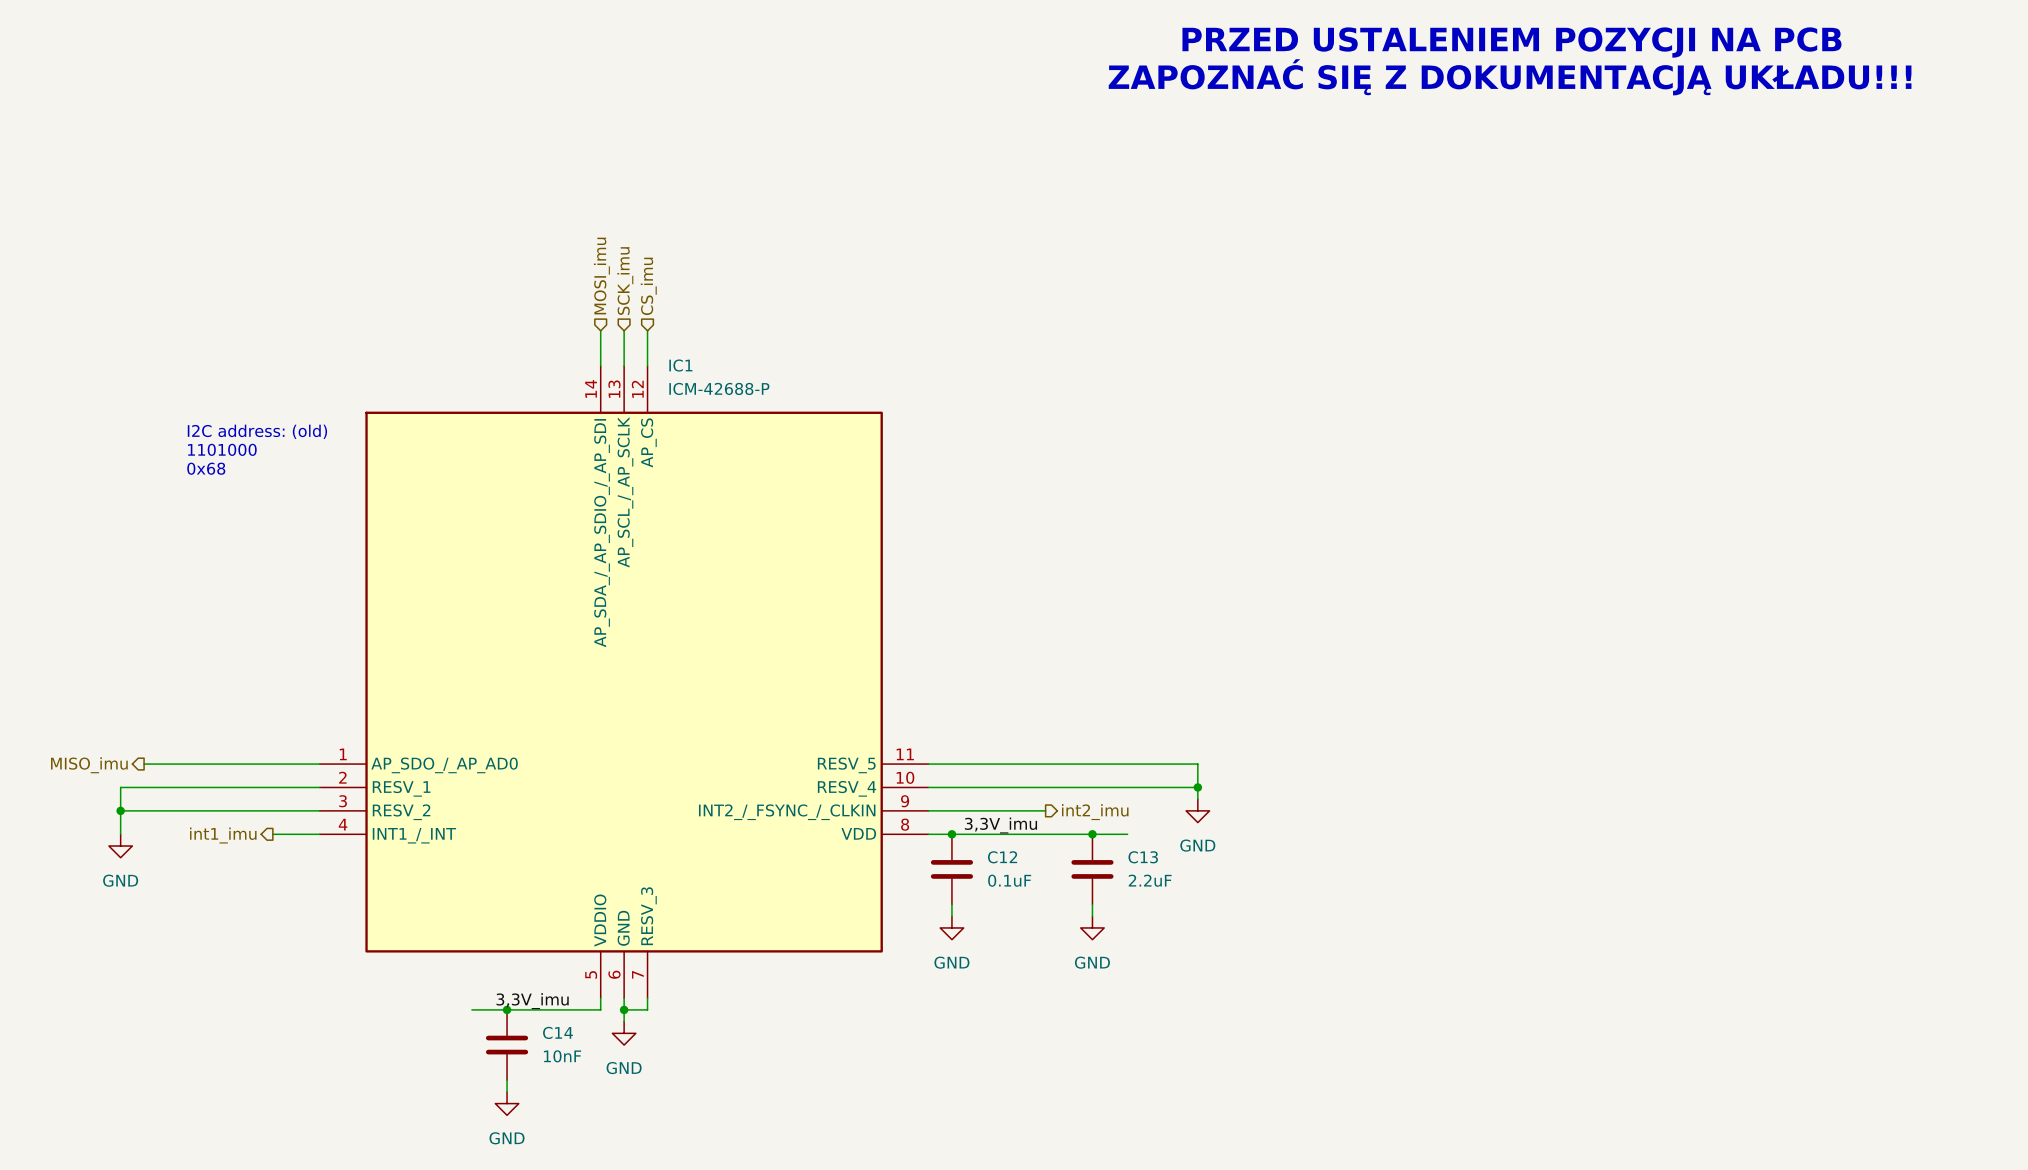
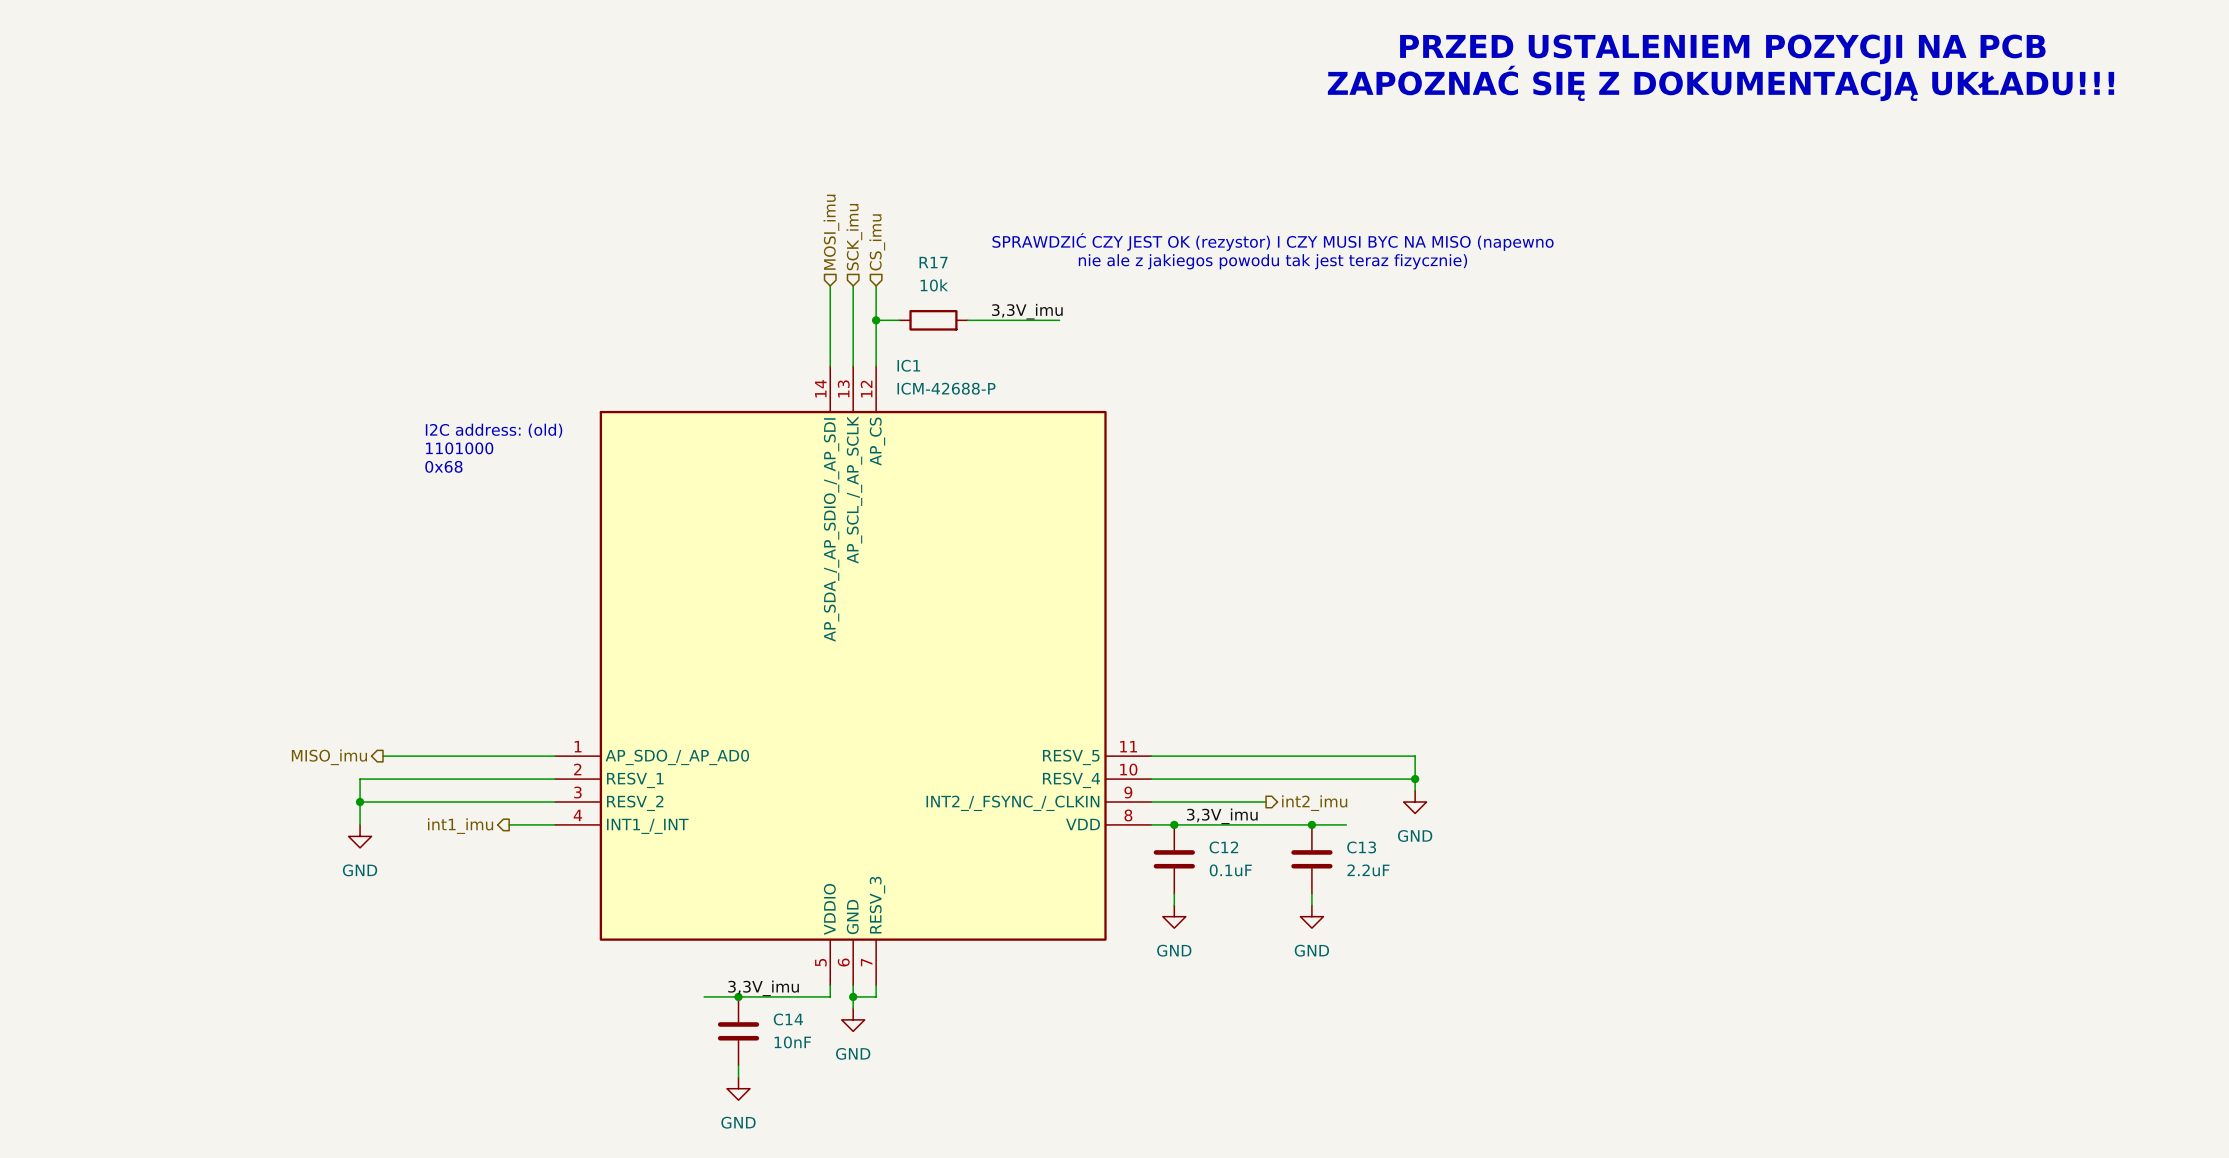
text: none -> SPRAWDZIĆ CZY JEST OK (rezystor) I CZY MUSI BYC NA MISO (napewno (1273, 241)
text: none -> nie ale z jakiegos powodu tak jest teraz fizycznie) (1272, 261)
hierarchical label position: MOSI_imu (601, 276) -> MOSI_imu (831, 232)
hierarchical label position: SCK_imu (625, 281) -> SCK_imu (854, 237)
wire: none -> (830, 285) (830, 331)
wire: none -> (853, 285) (853, 331)
wire: none -> (876, 285) (876, 331)
hierarchical label position: CS_imu (648, 286) -> CS_imu (877, 242)
label: none -> 3,3V_imu (1027, 311)
wire: none -> (876, 320) (899, 320)
junction: none -> (876, 320)
R17: none -> 10k (933, 320)
wire: none -> (967, 320) (1059, 320)

